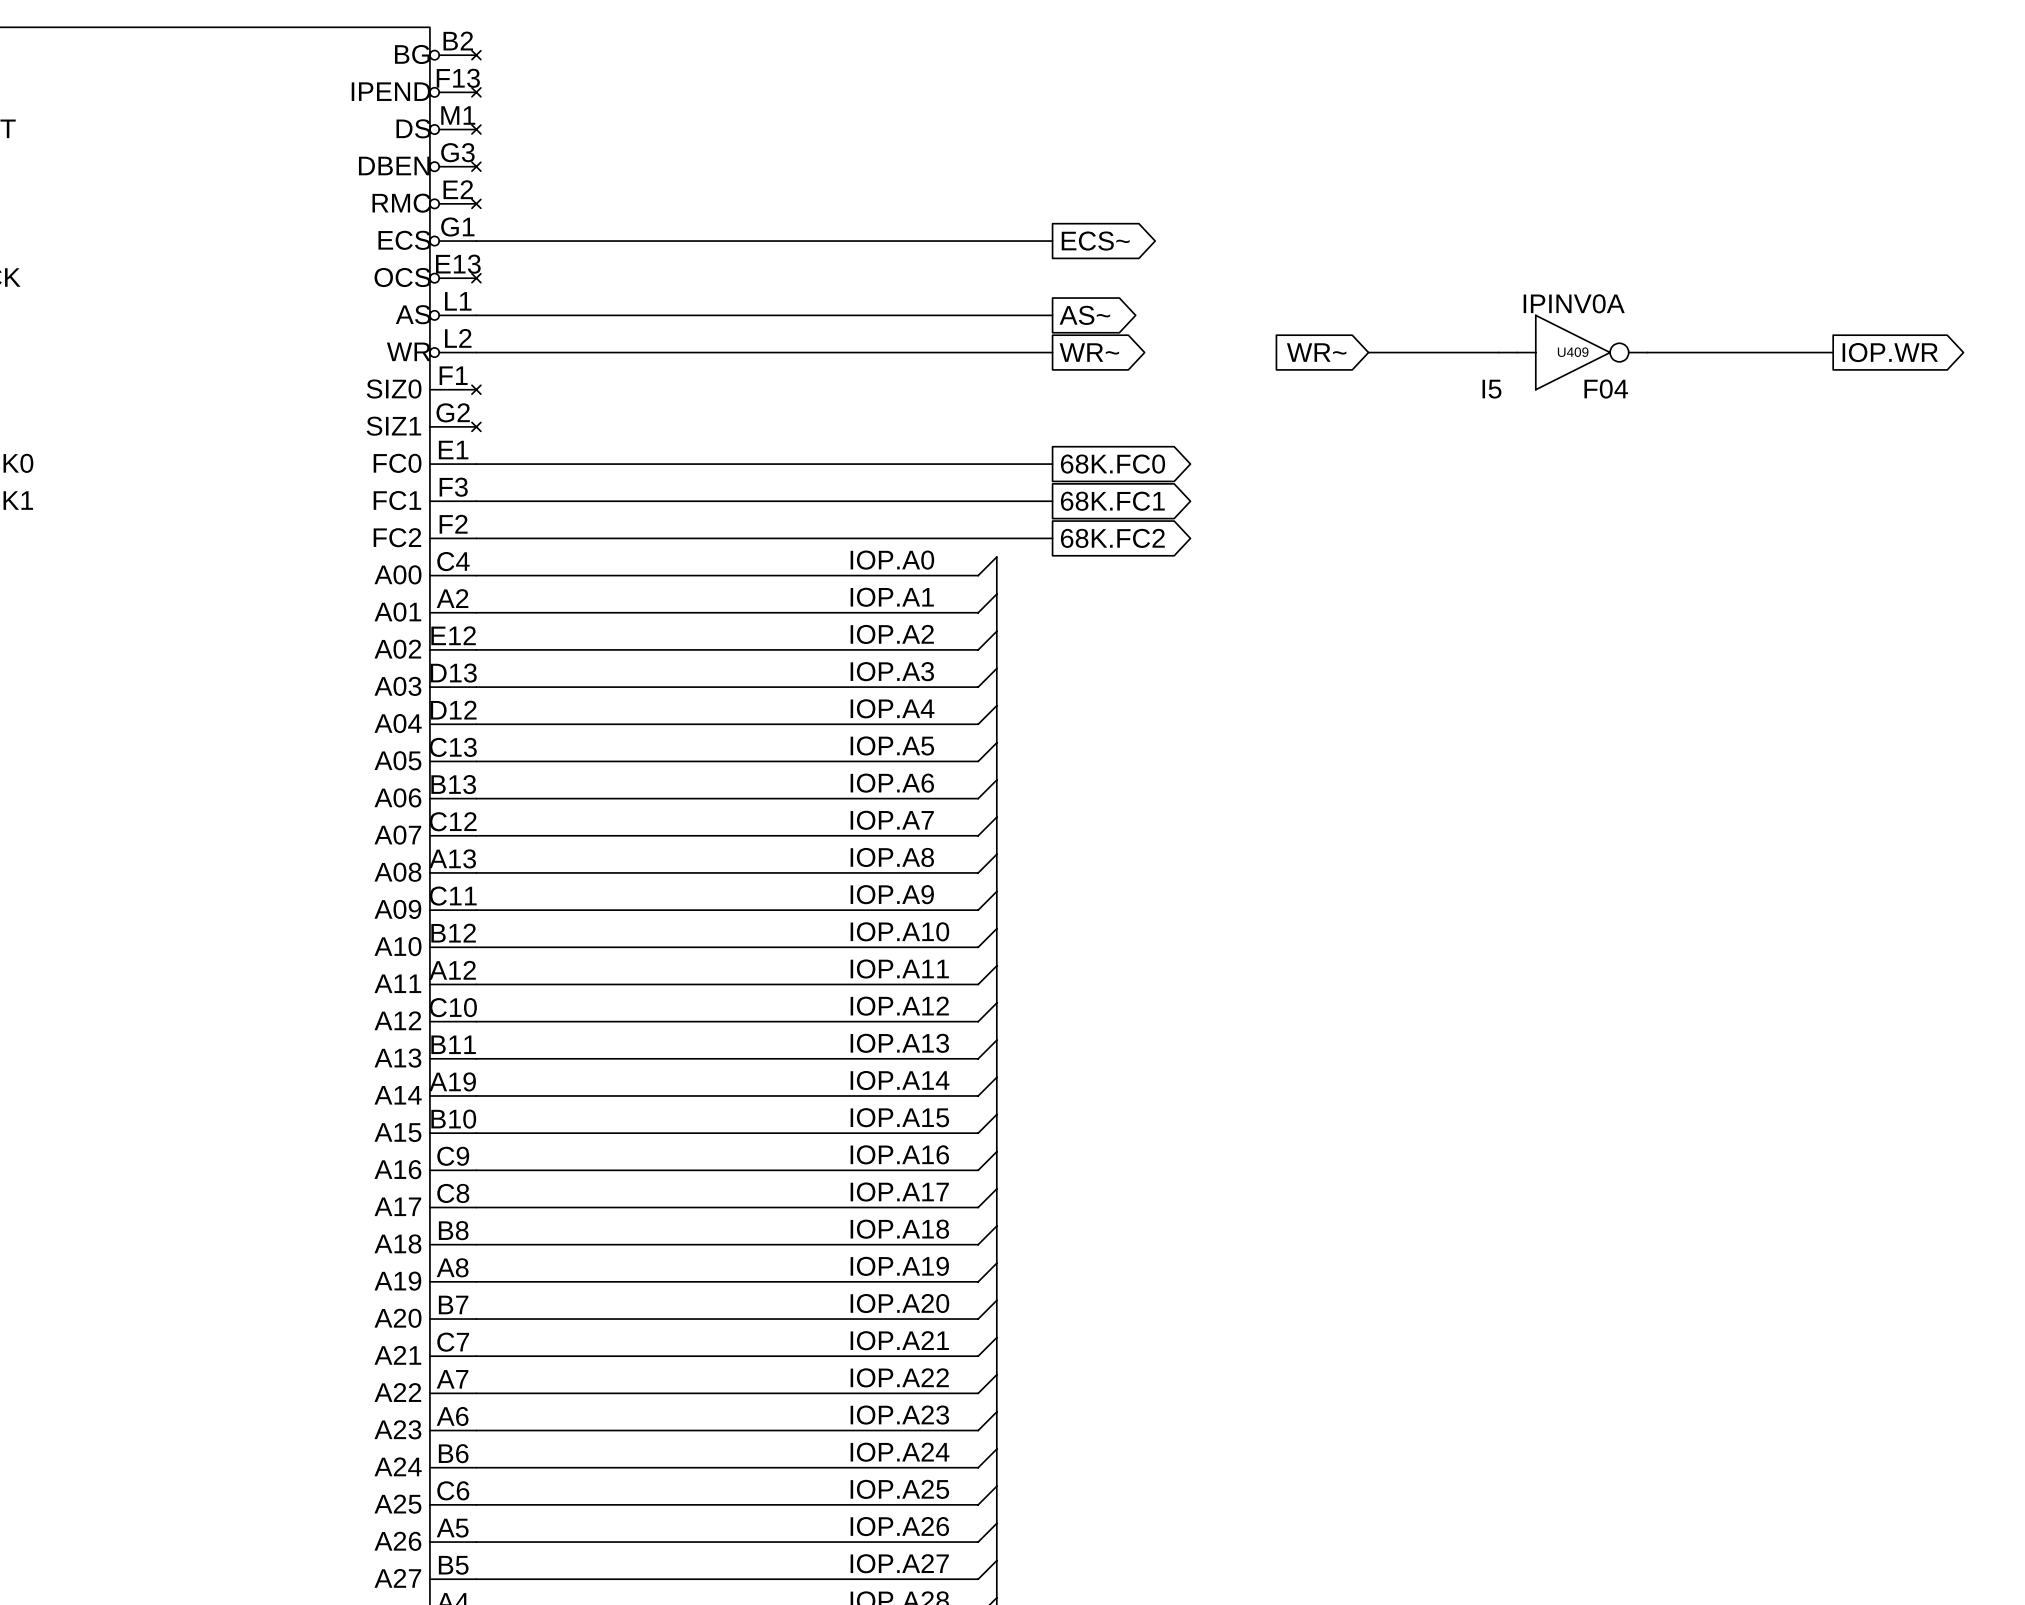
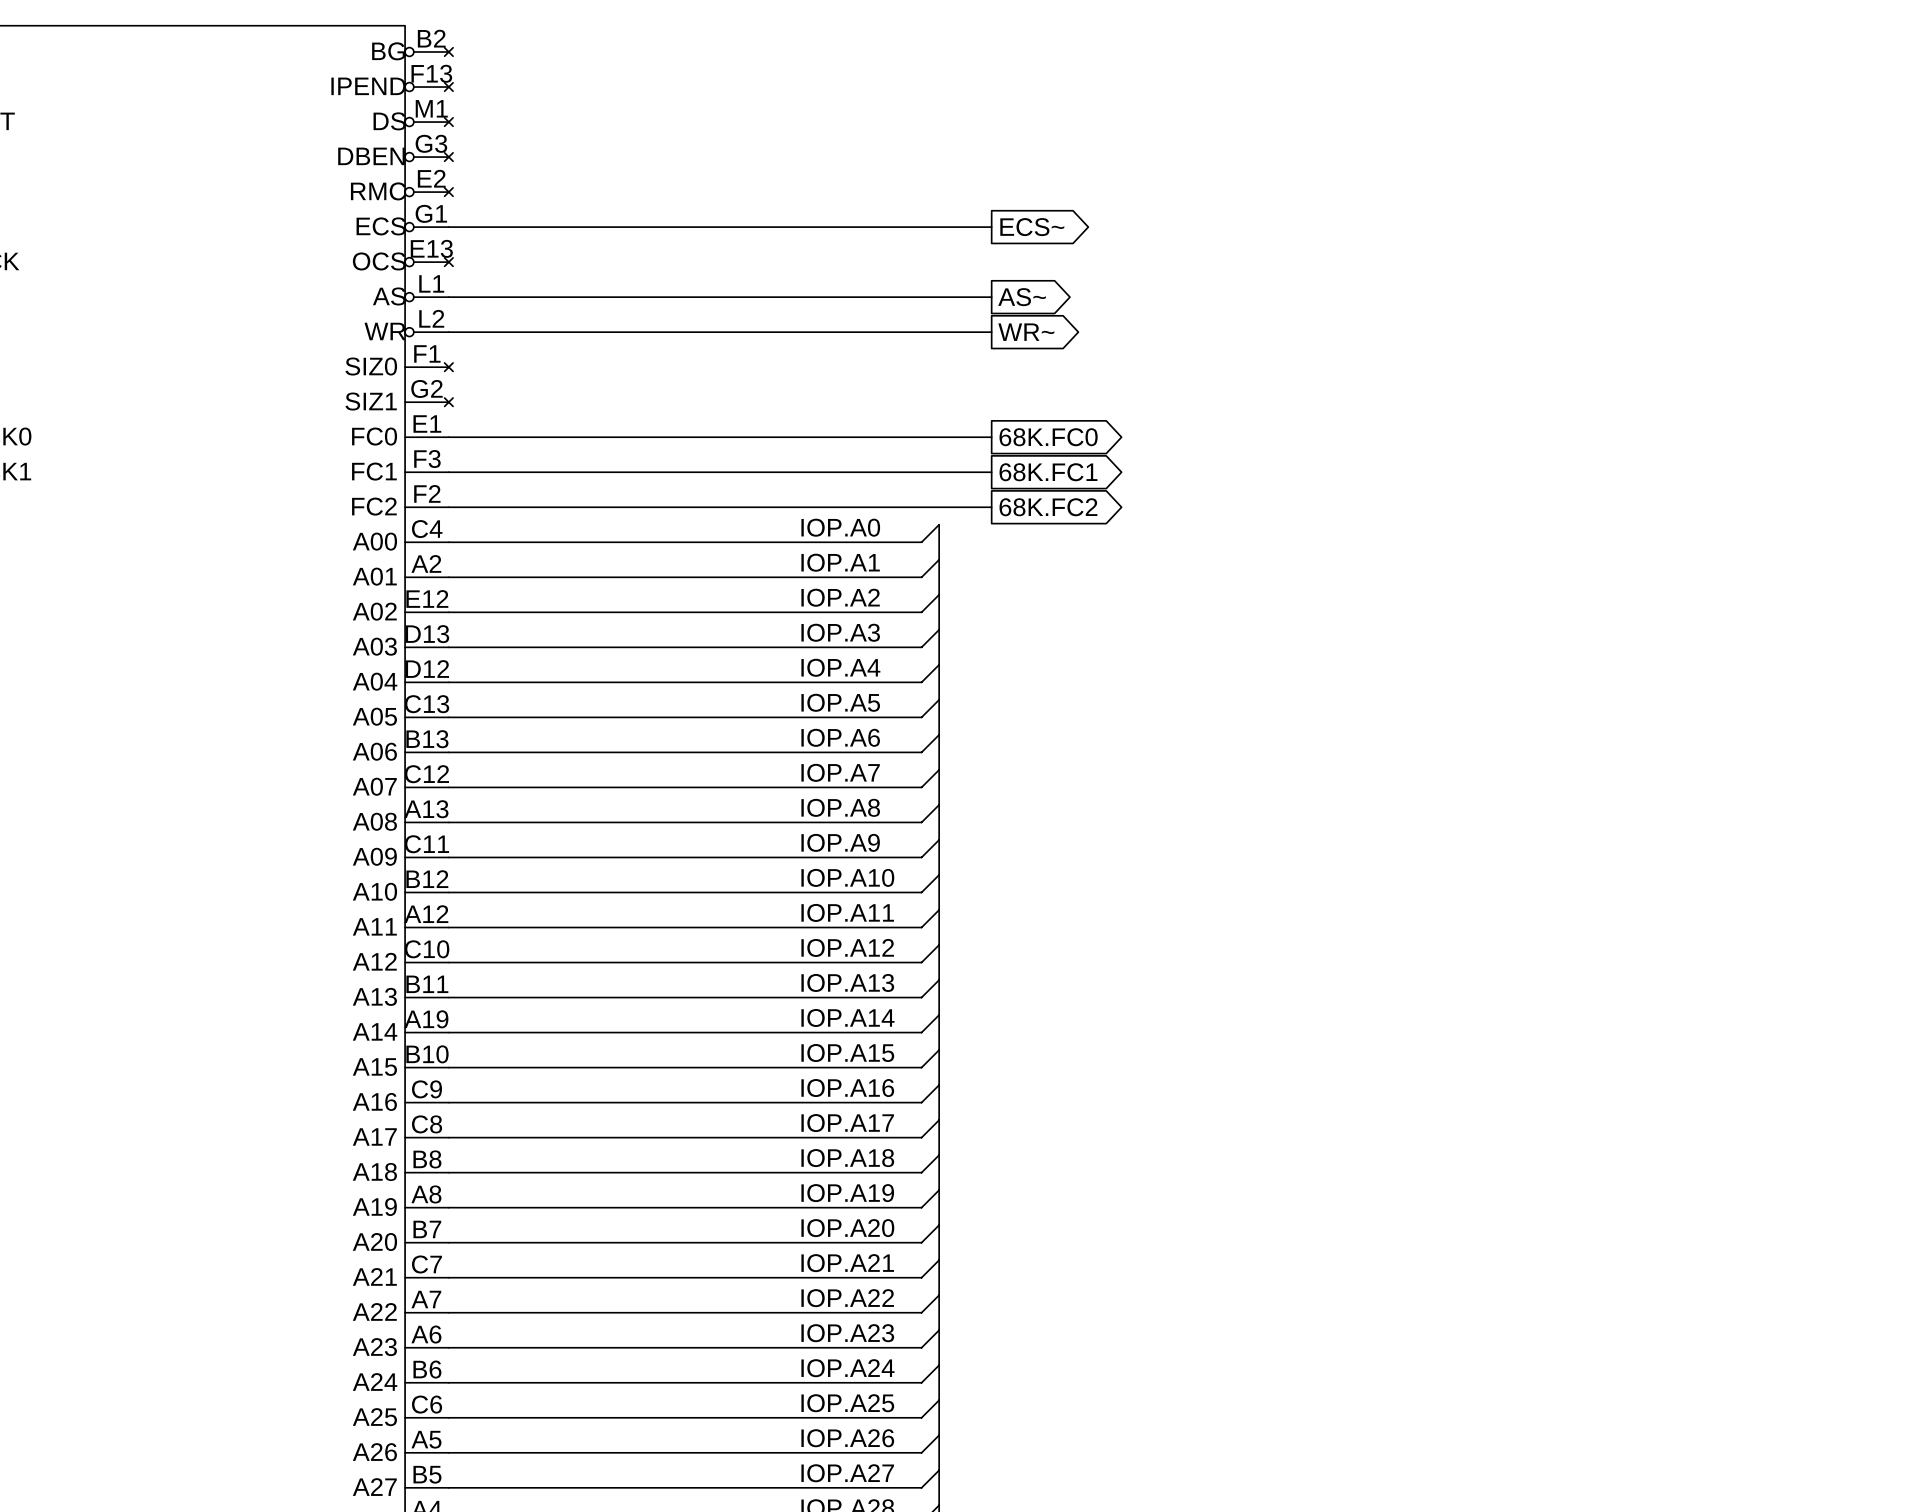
global label: WR~ (1316, 352) -> none
wire: (1368, 352) (1498, 352) -> none
U409: F04 (1572, 352) -> none
wire: (1647, 352) (1833, 352) -> none
global label: IOP.WR (1890, 352) -> none

